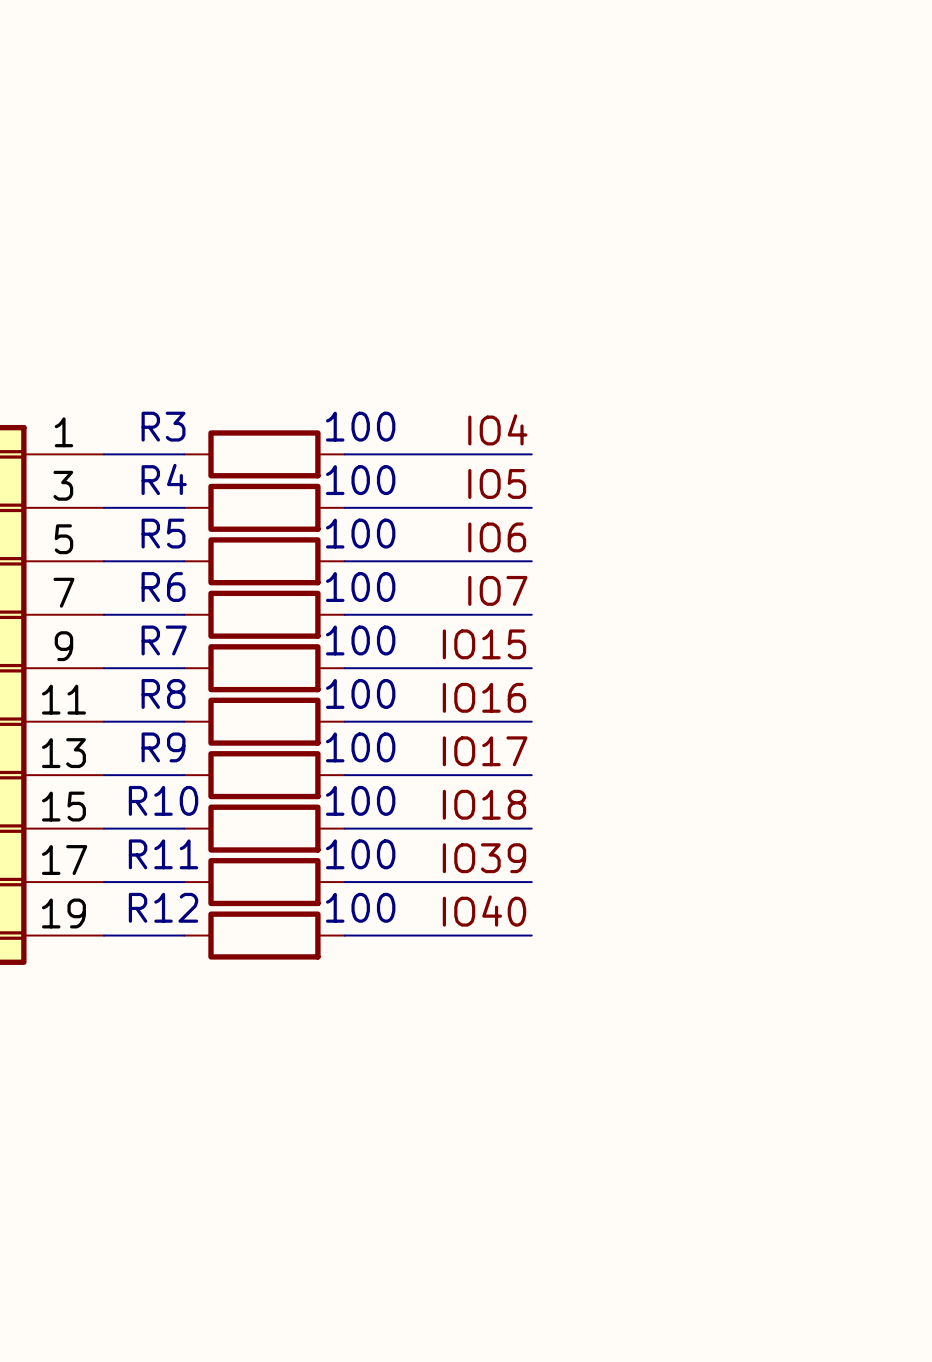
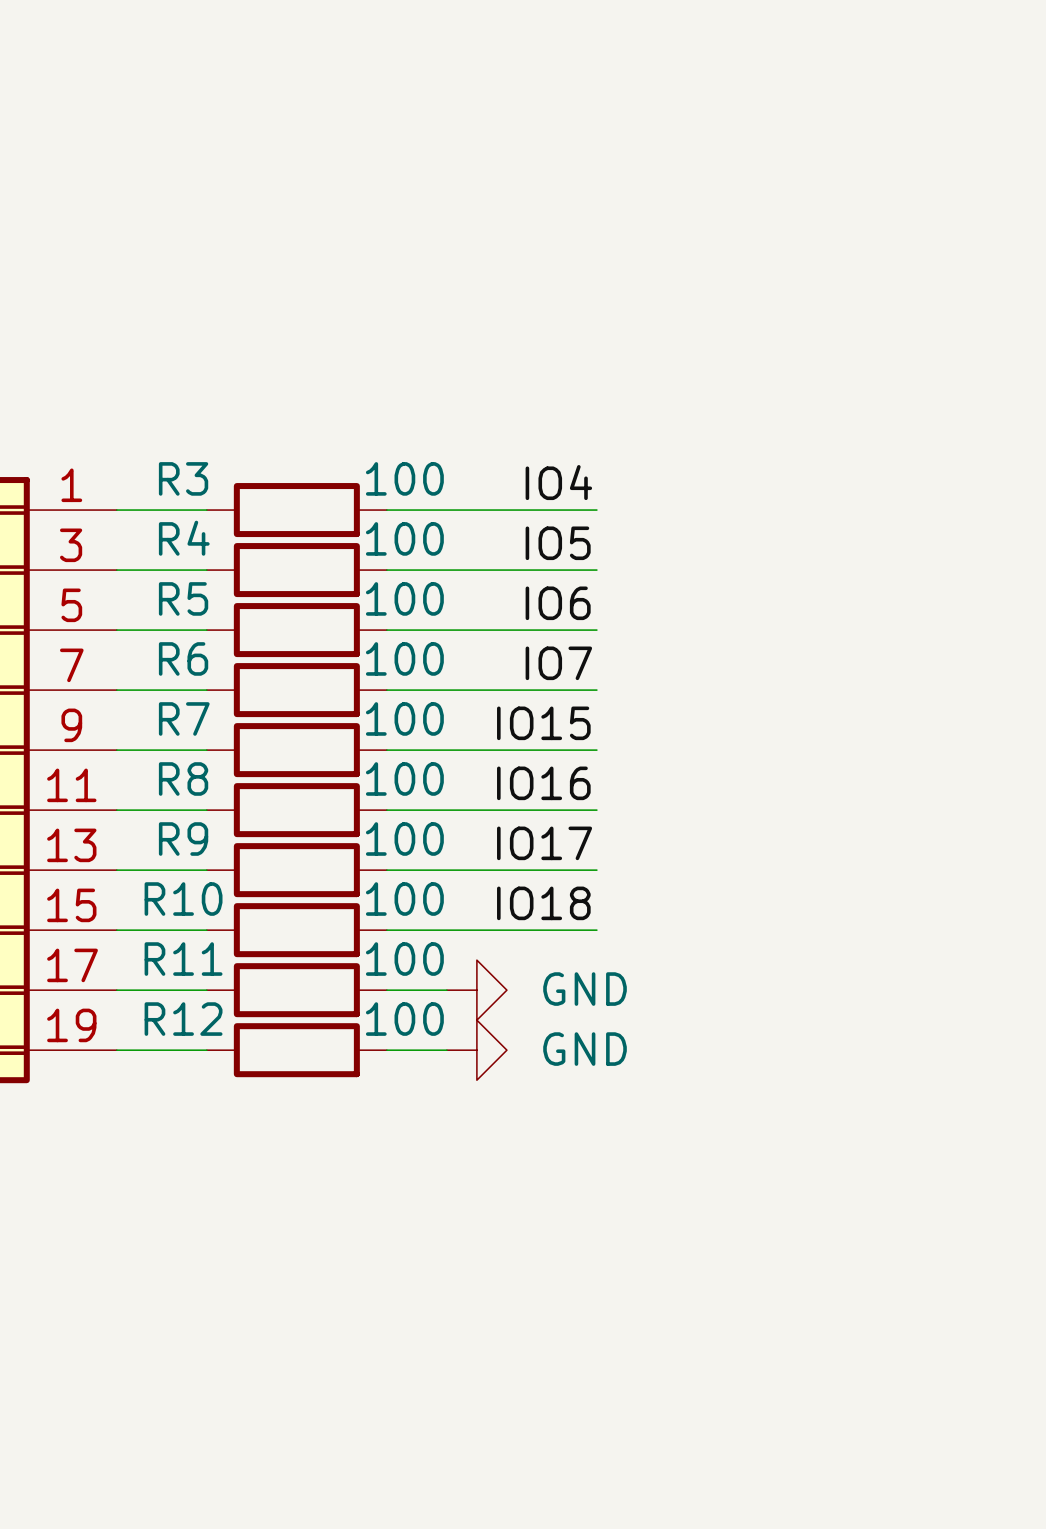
label: IO39 (484, 858) -> none
wire: (398, 882) (531, 882) -> none
power symbol: none -> GND (476, 990)
label: IO40 (484, 911) -> none
wire: (398, 935) (531, 935) -> none
power symbol: none -> GND (476, 1050)

